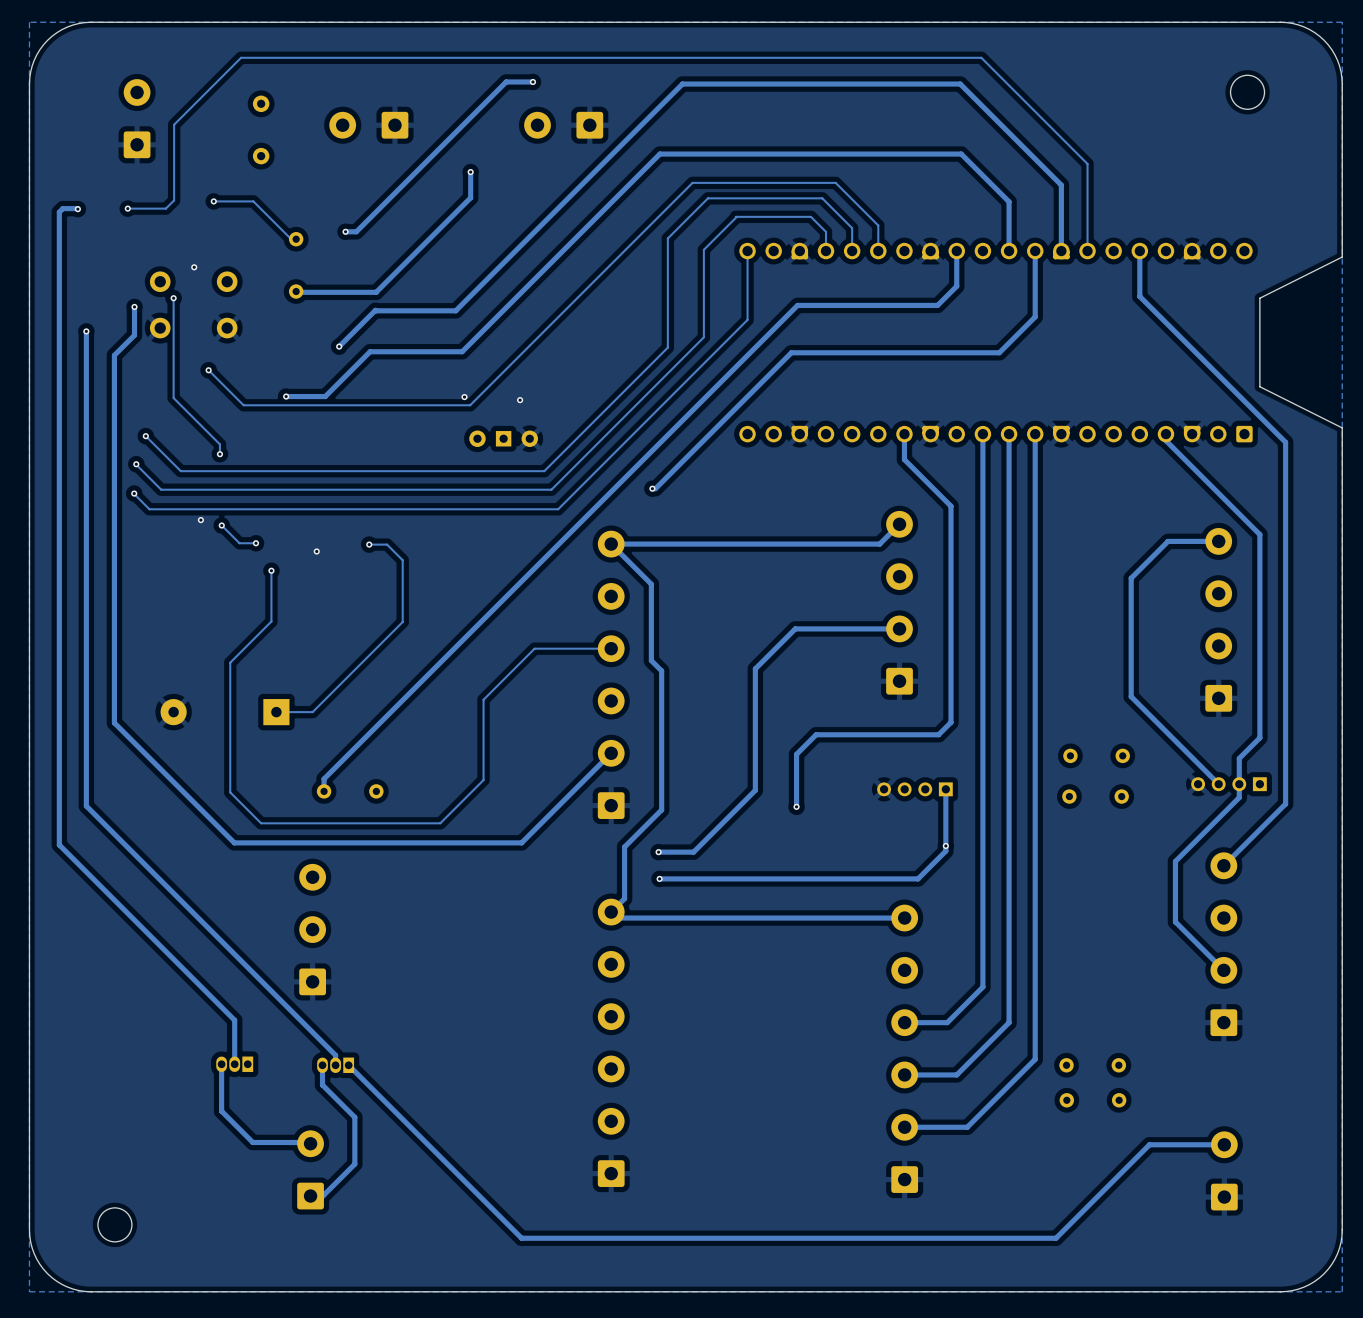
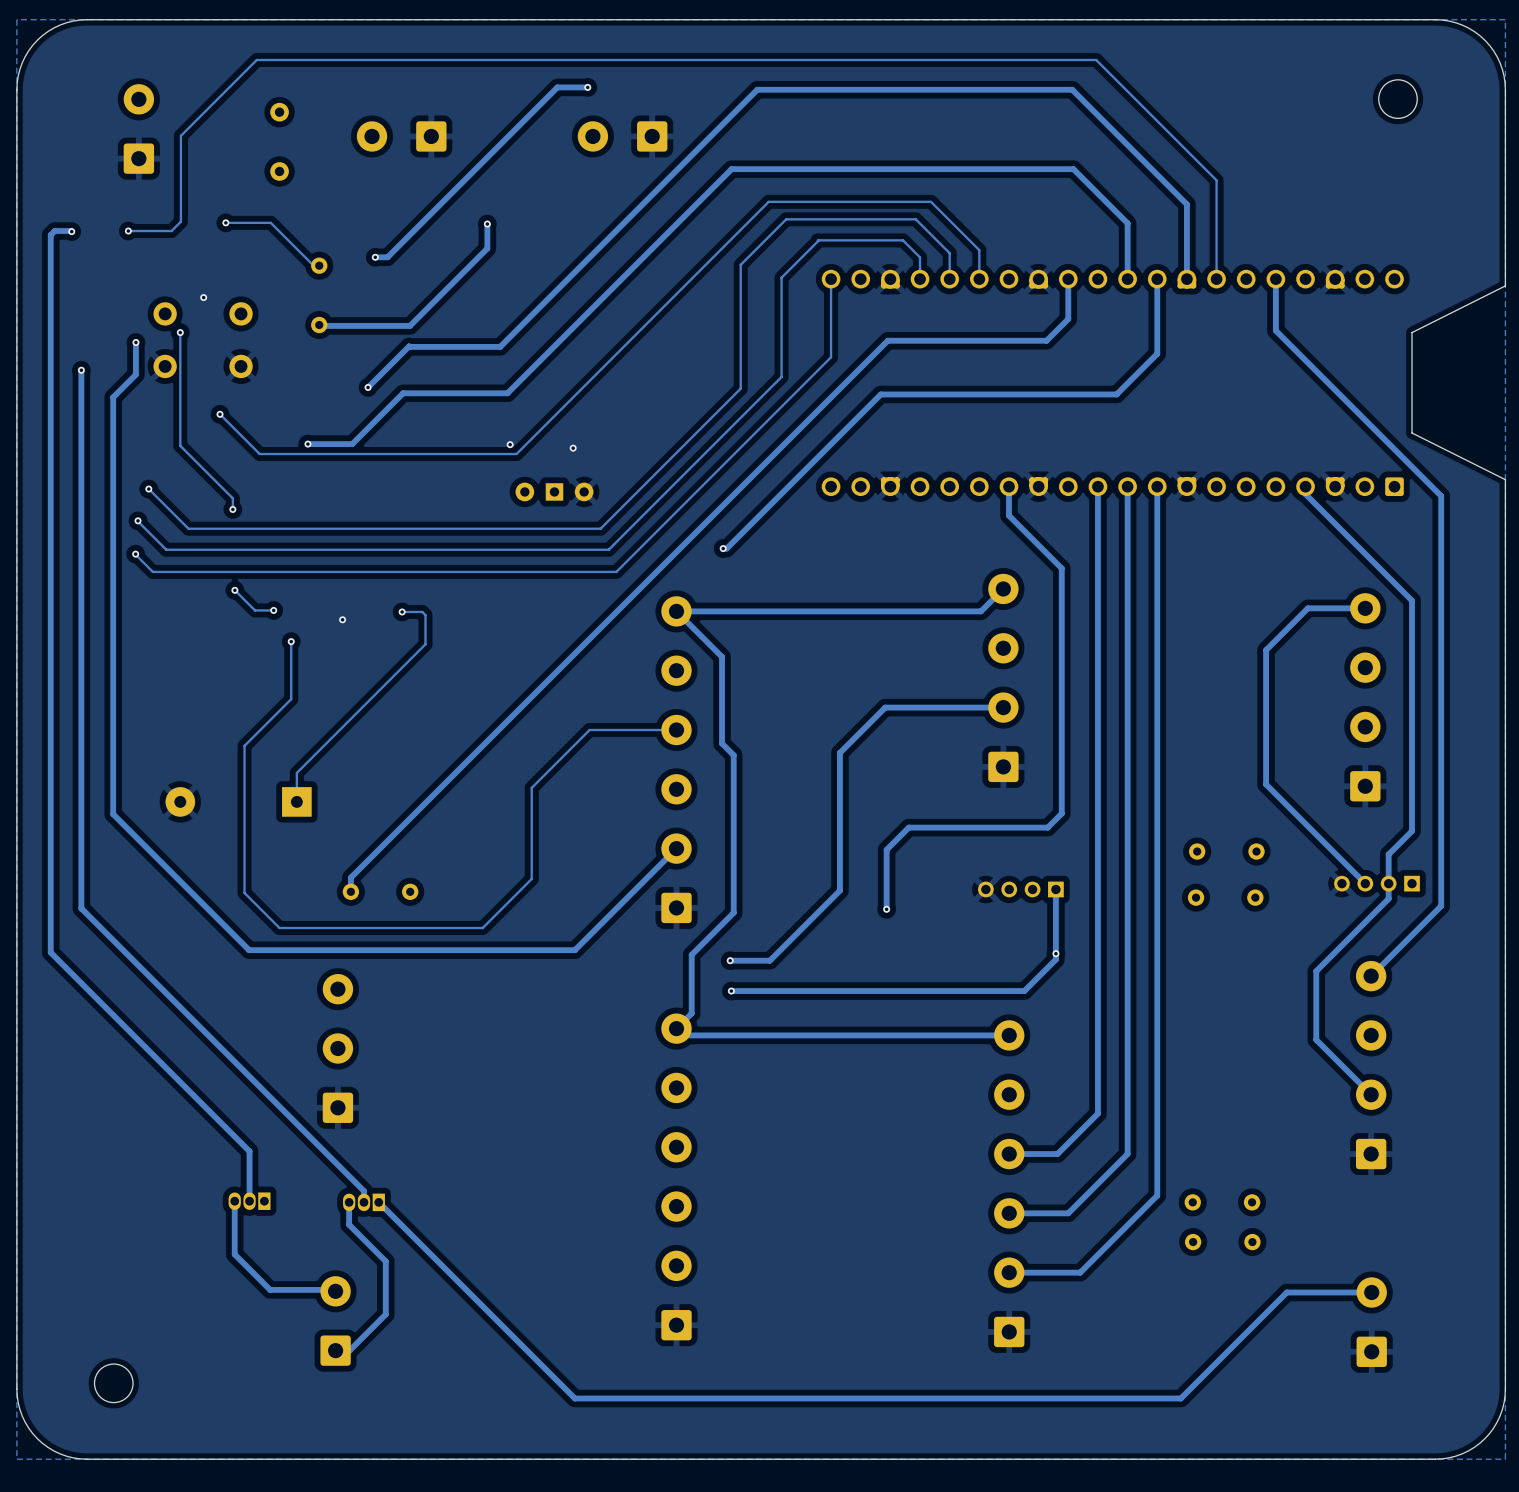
track: (470, 172) (470, 197) (444, 224) -> (487, 224) (487, 248)
via position: (470, 172) -> (487, 224)
via: (200, 520) -> none
track: (389, 547) (402, 560) (402, 622) (312, 712) (276, 712) -> (425, 615) (425, 644) (296, 772) (296, 801)

